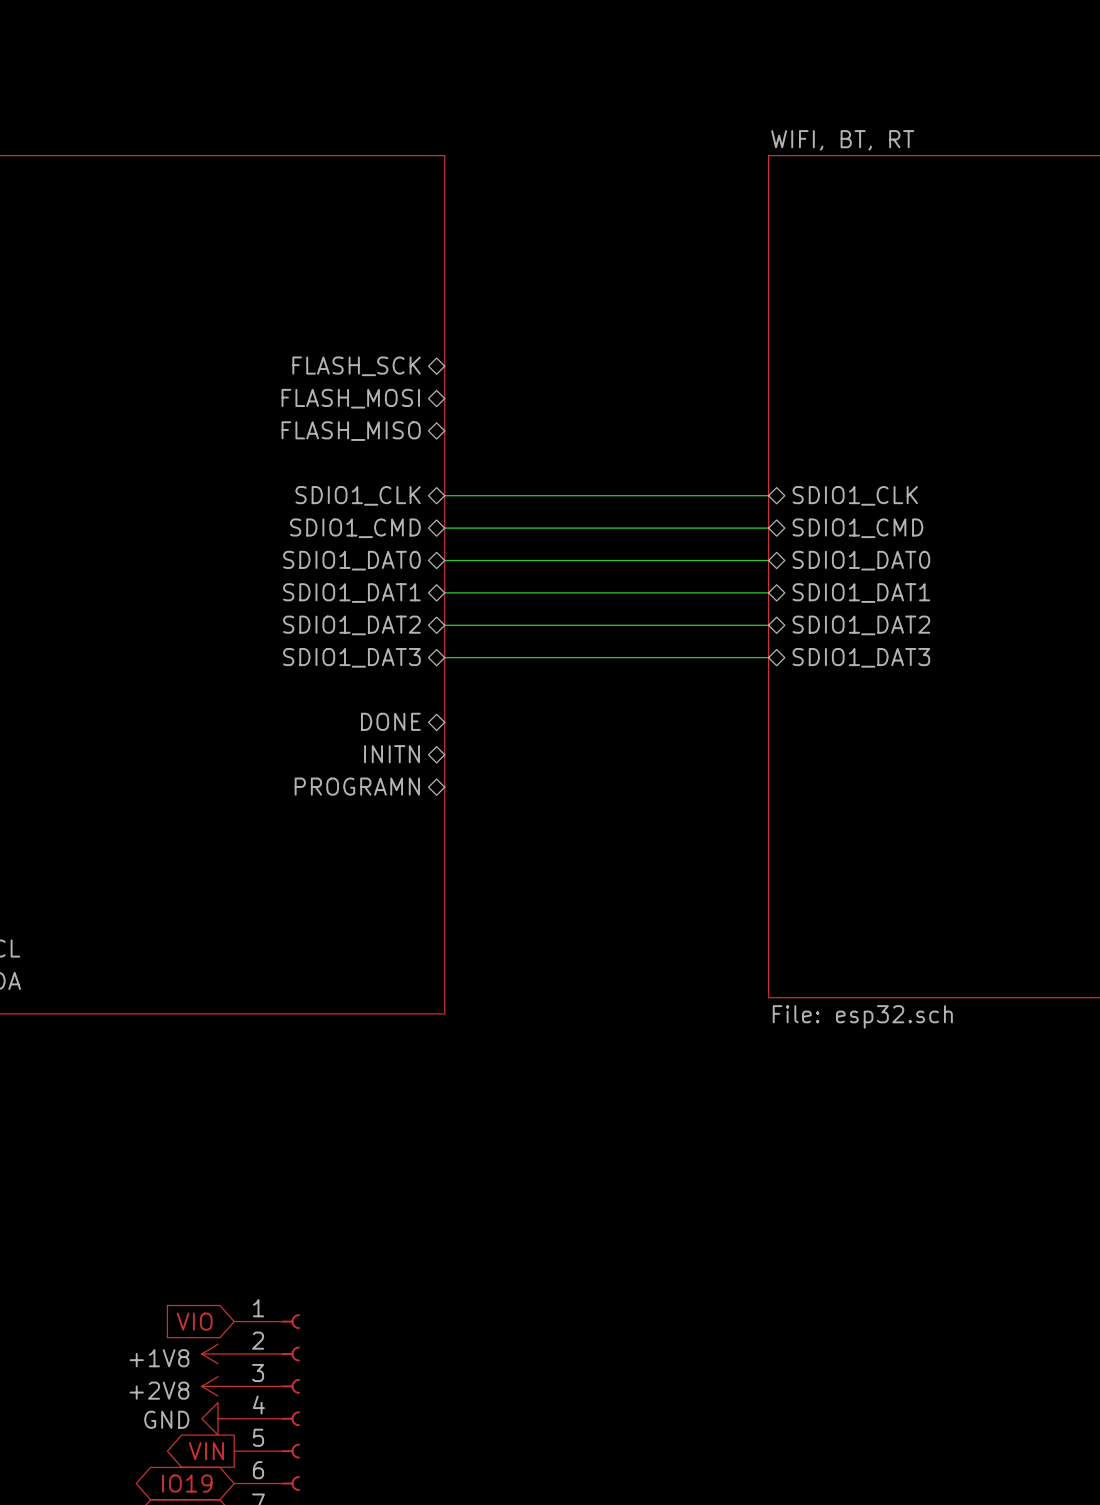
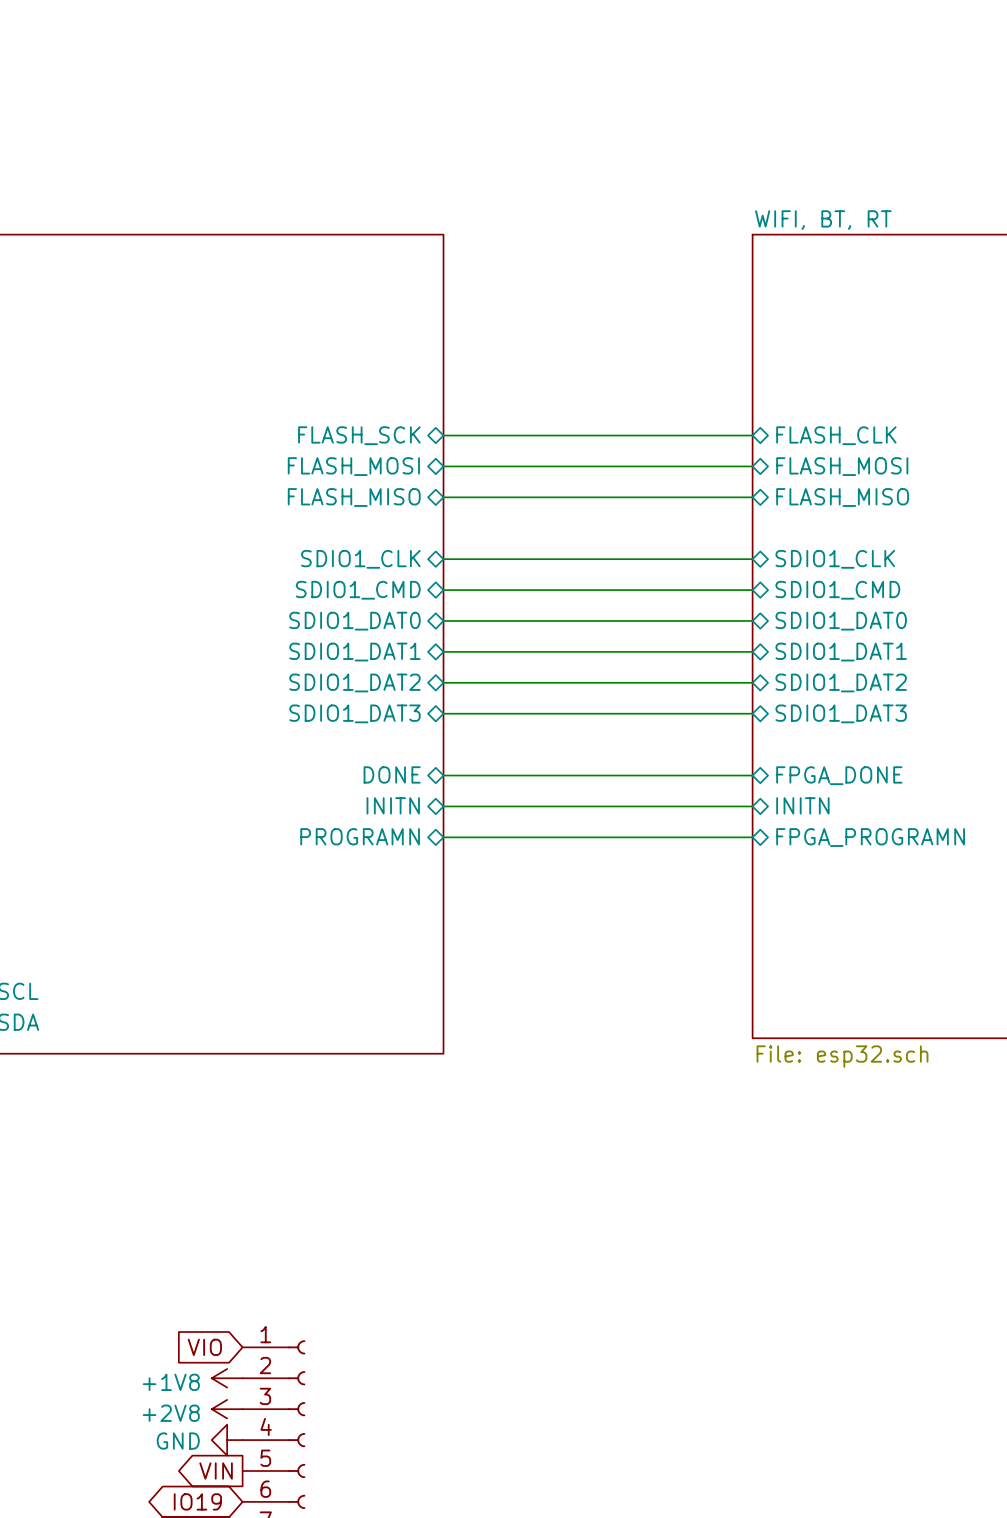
wire: none -> (443, 435) (752, 435)
sheet pin: none -> FLASH_CLK (836, 435)
wire: none -> (443, 466) (752, 466)
sheet pin: none -> FLASH_MOSI (842, 466)
wire: none -> (443, 497) (752, 497)
sheet pin: none -> FLASH_MISO (842, 497)
wire: none -> (443, 775) (752, 775)
sheet pin: none -> FPGA_DONE (839, 775)
wire: none -> (443, 806) (752, 806)
sheet pin: none -> INITN (802, 805)
wire: none -> (443, 837) (752, 837)
sheet pin: none -> FPGA_PROGRAMN (870, 837)

